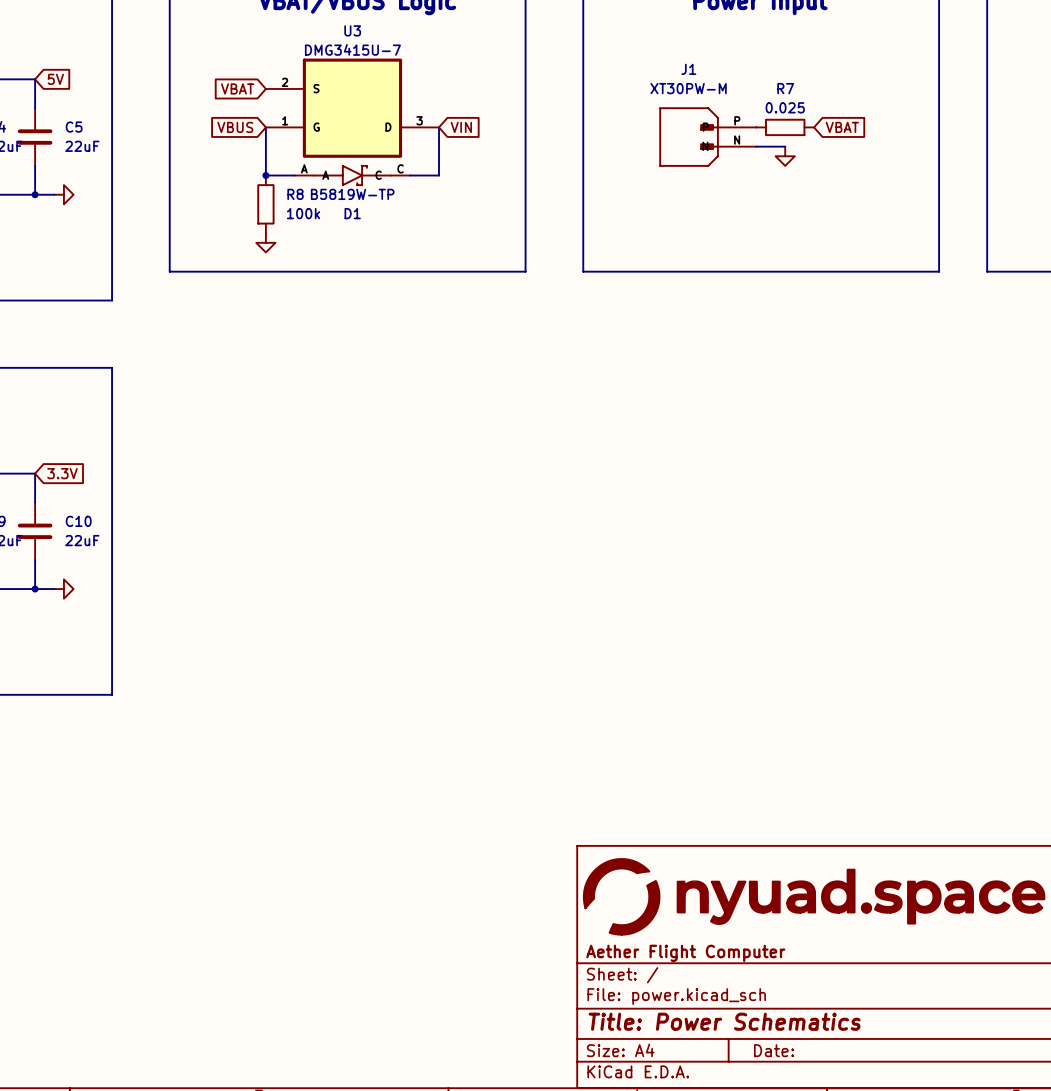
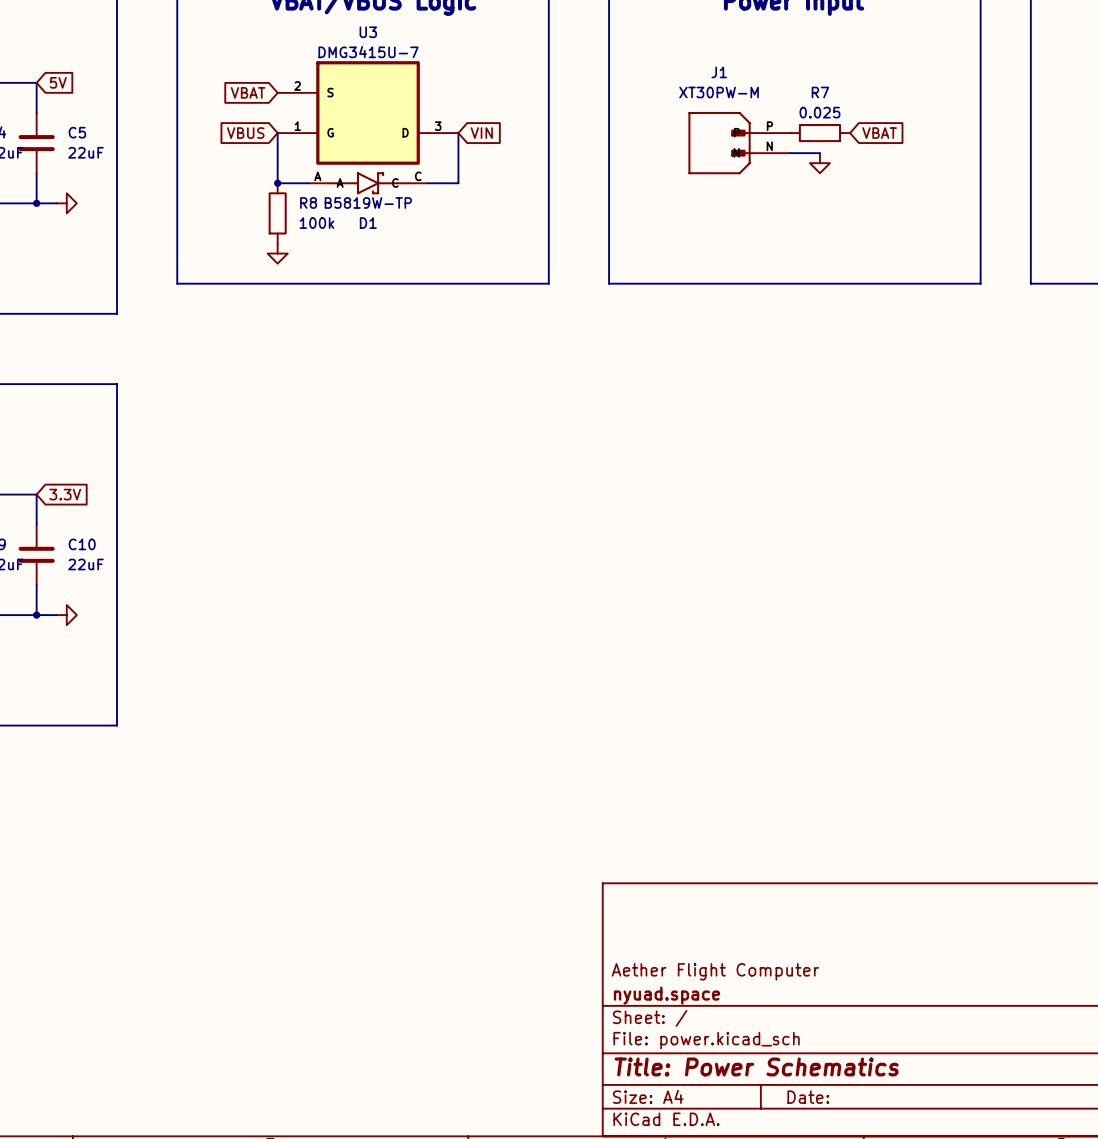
power symbol: (814, 896) -> none
title block: none -> Aether Flight Computer (715, 971)
title block: Aether Flight Computer (685, 953) -> nyuad.space (666, 995)

